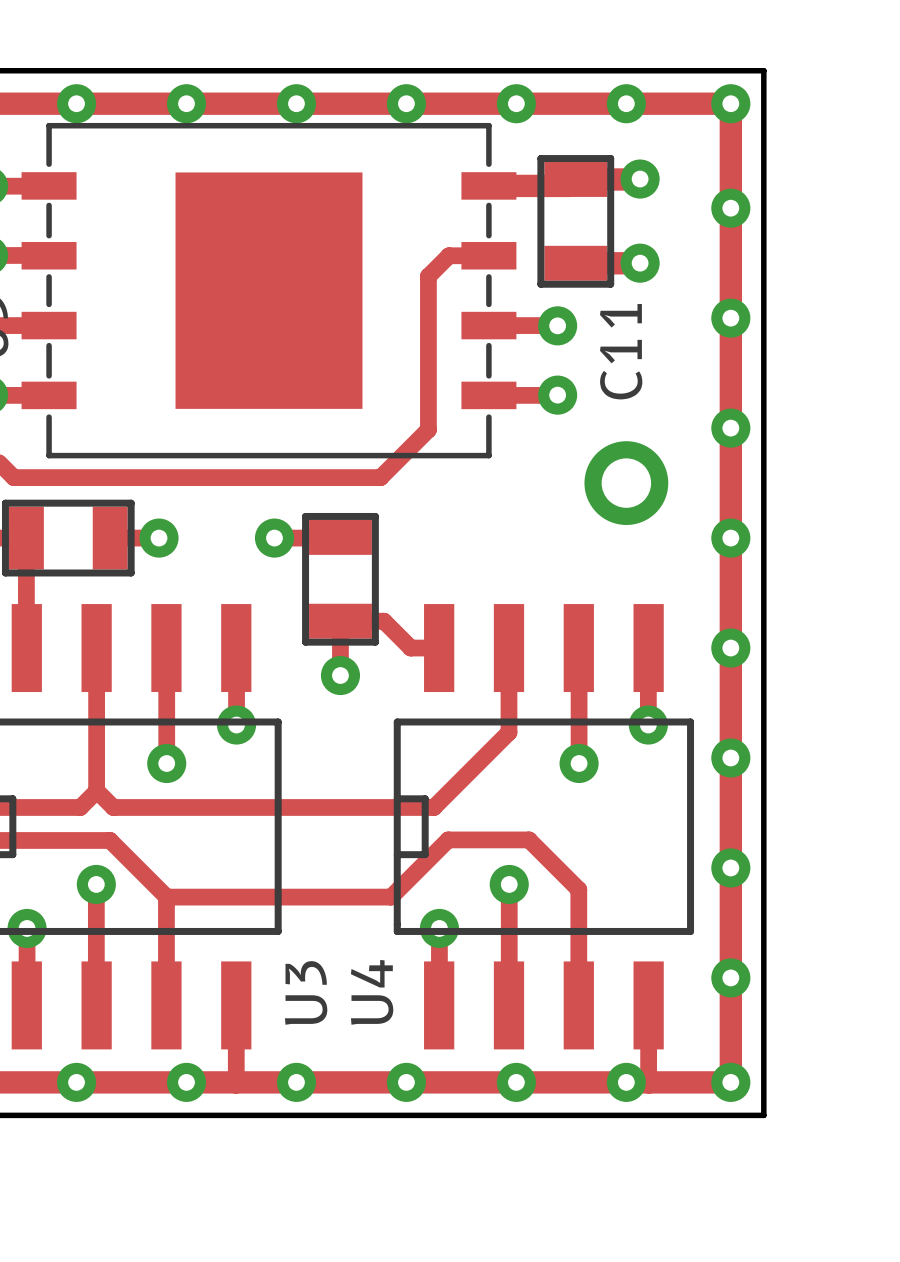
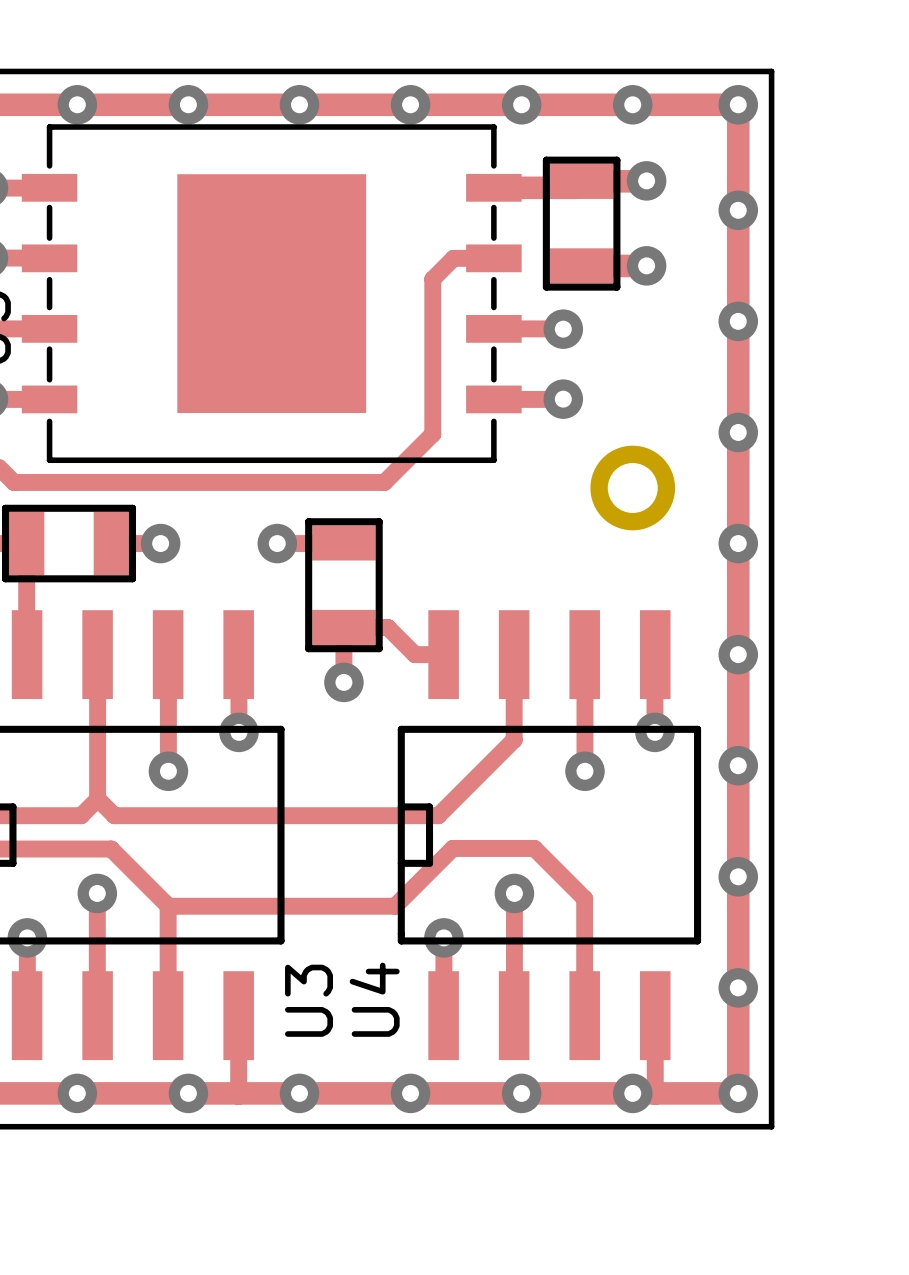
C11 name: C11 (621, 351) -> none

